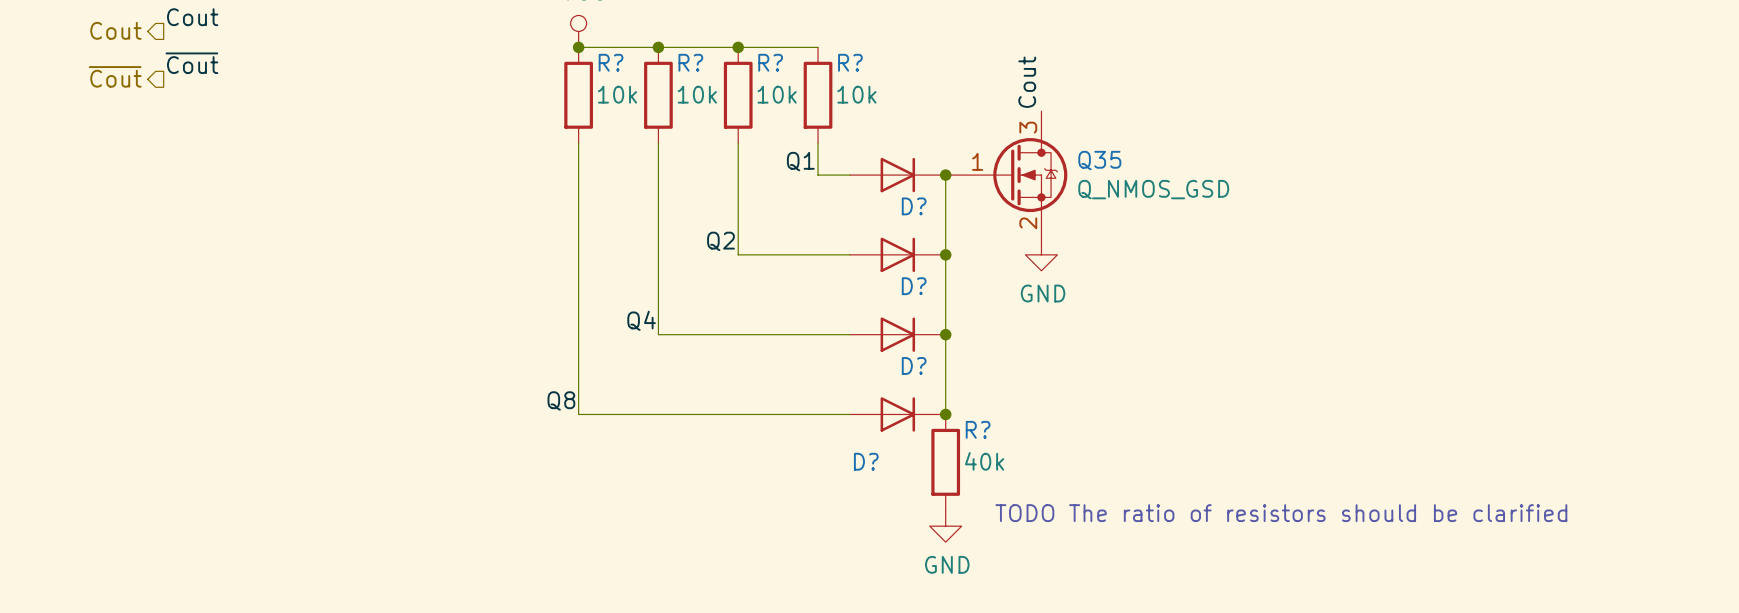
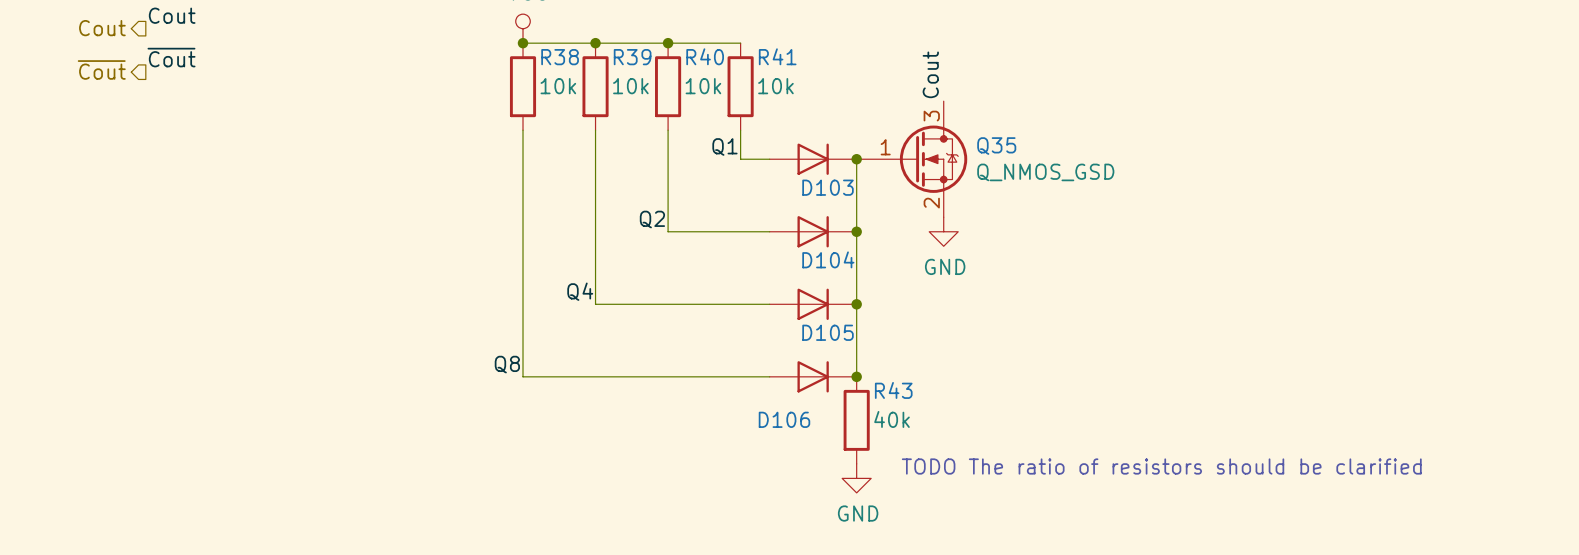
R? name: R? (611, 62) -> R38 (560, 57)
R? name: R? (690, 62) -> R39 (632, 57)
R? name: R? (770, 62) -> R40 (705, 56)
R? name: R? (850, 62) -> R41 (777, 56)
D? name: D? (914, 206) -> D103 (828, 187)
D? name: D? (914, 286) -> D104 (828, 259)
D? name: D? (914, 365) -> D105 (828, 332)
R? name: R? (978, 429) -> R43 (893, 390)
D? name: D? (866, 461) -> D106 (784, 419)

